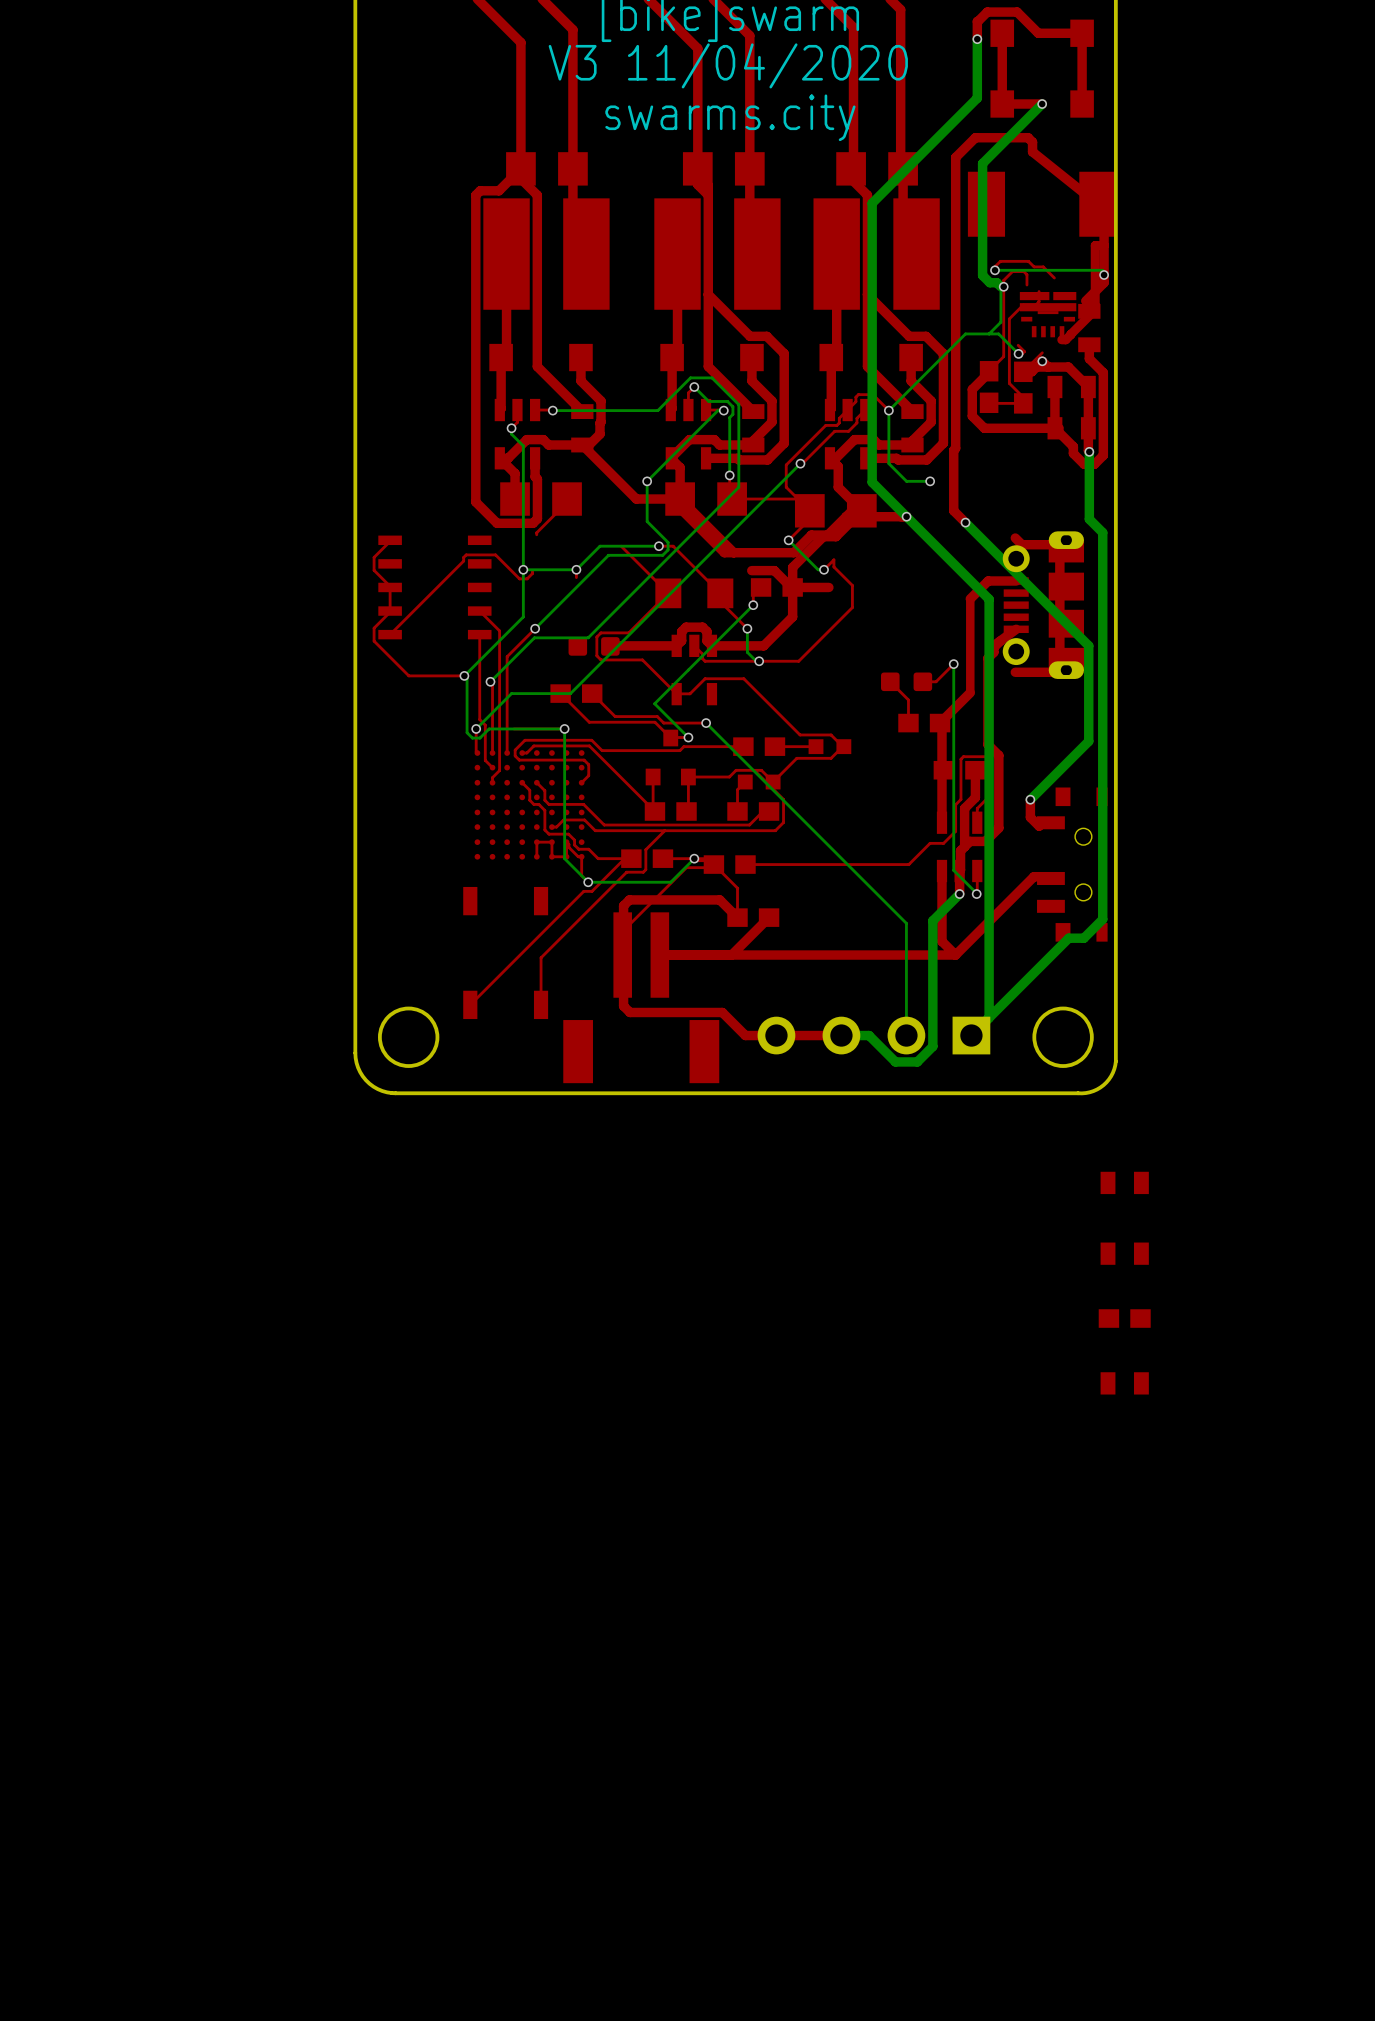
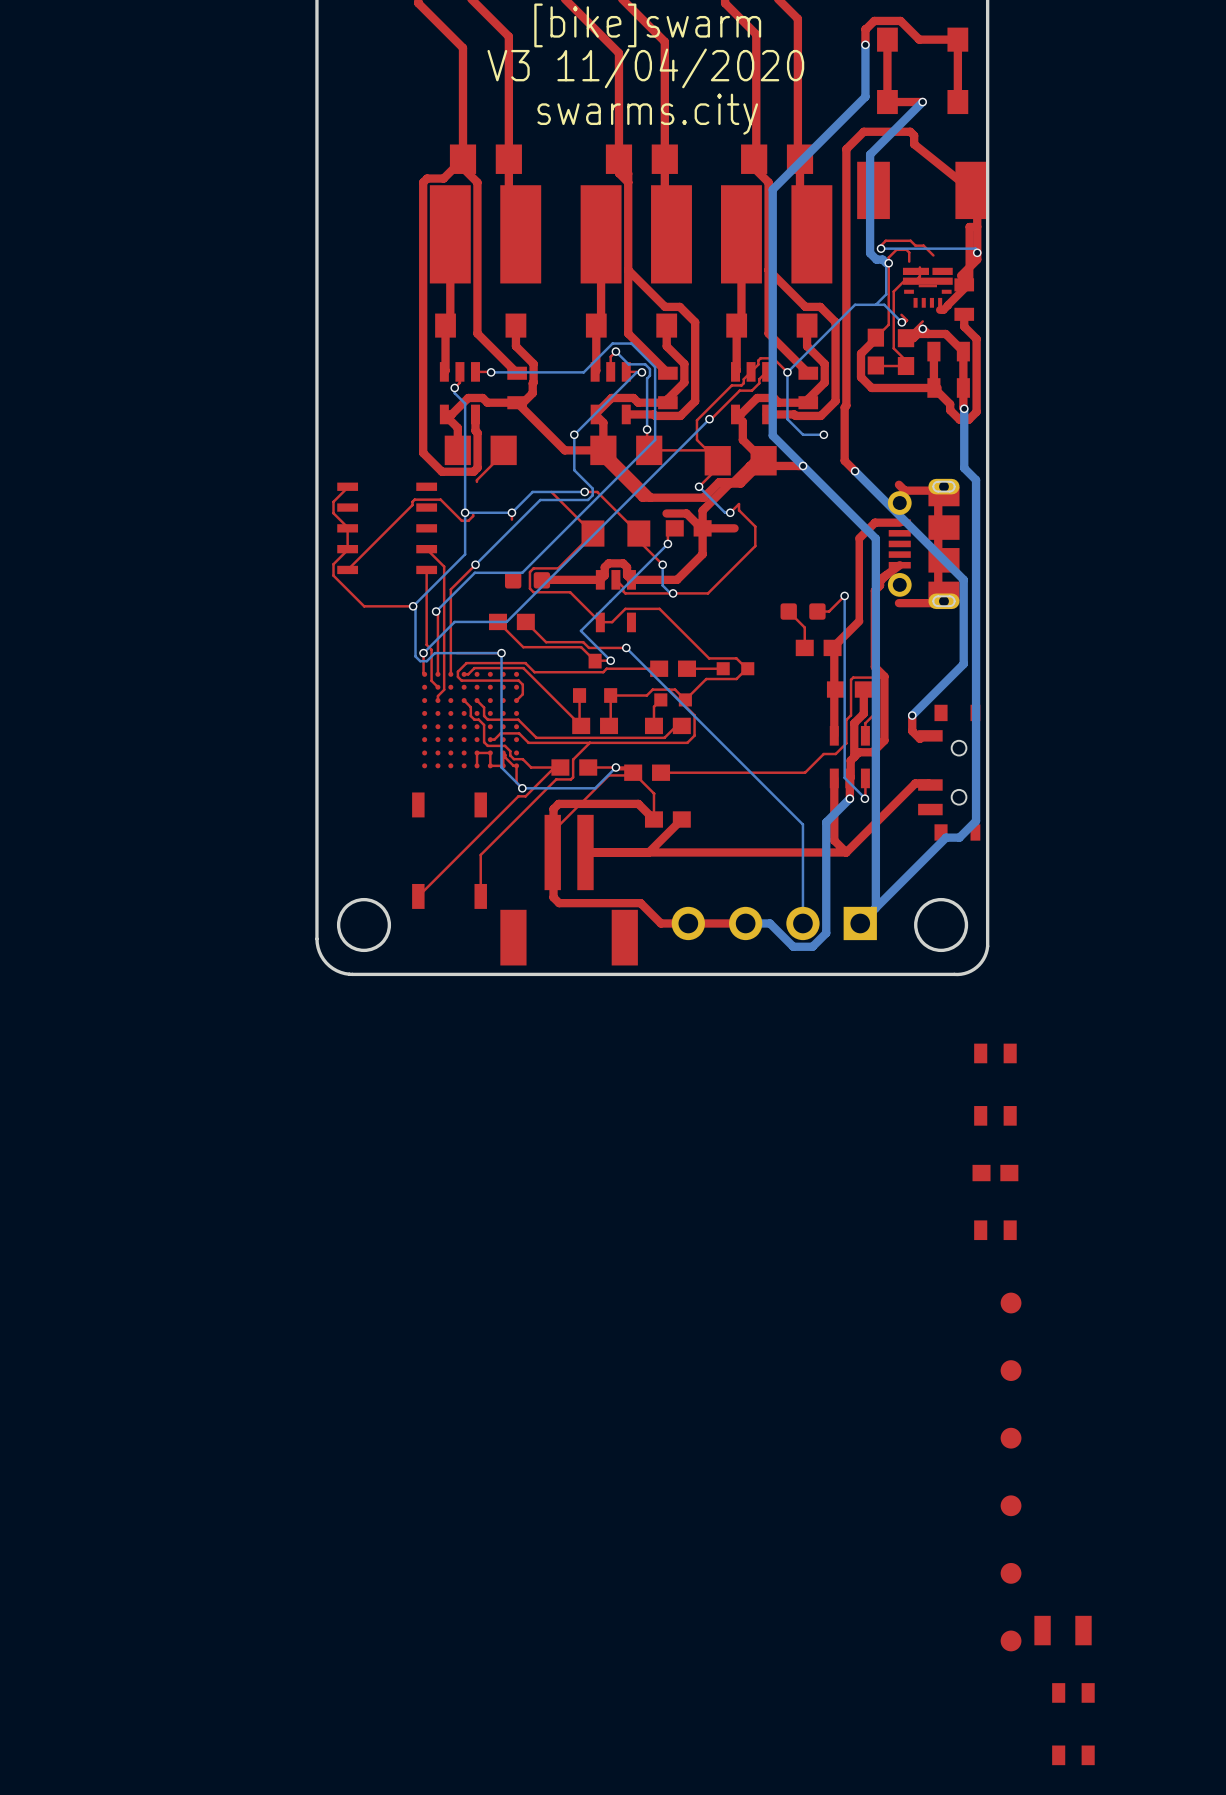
part: none -> (1011, 1303)
part: none -> (1011, 1370)
part: none -> (1011, 1438)
part: none -> (1011, 1505)
part: none -> (1011, 1573)
part: none -> (1063, 1630)
part: none -> (1011, 1640)
part: none -> (1073, 1692)
part: none -> (1073, 1755)

